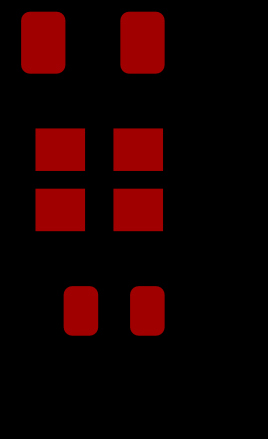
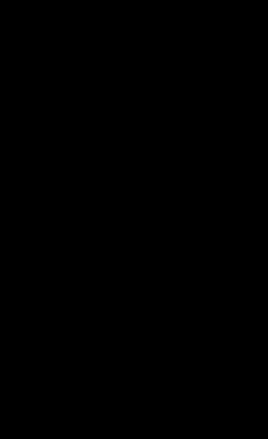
part: (92, 42) -> none
part: (99, 179) -> none
part: (114, 310) -> none

